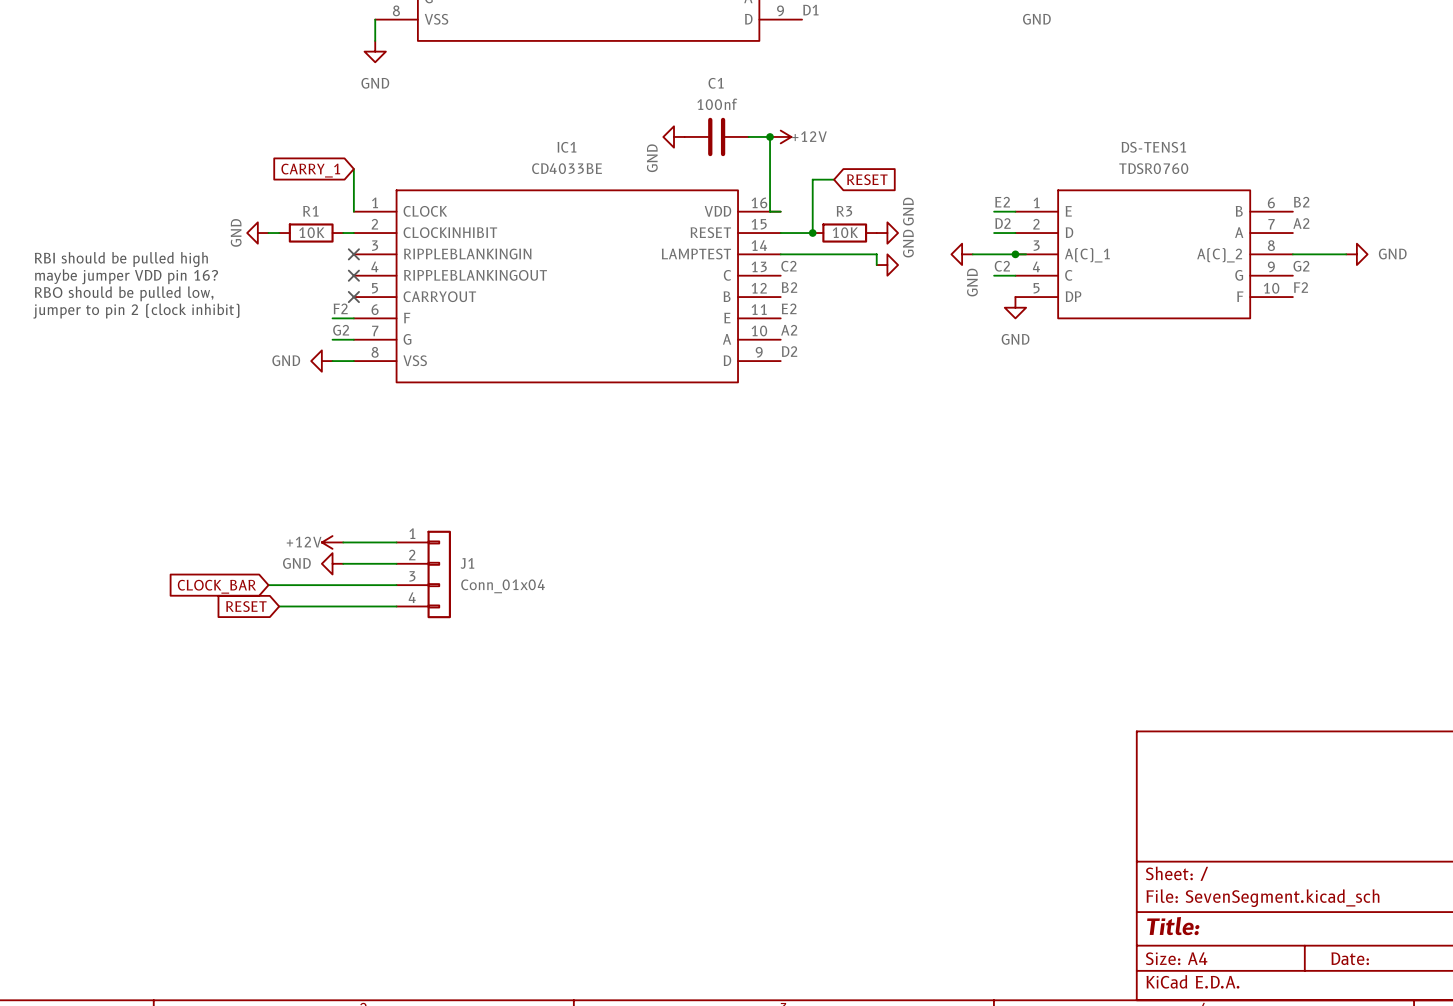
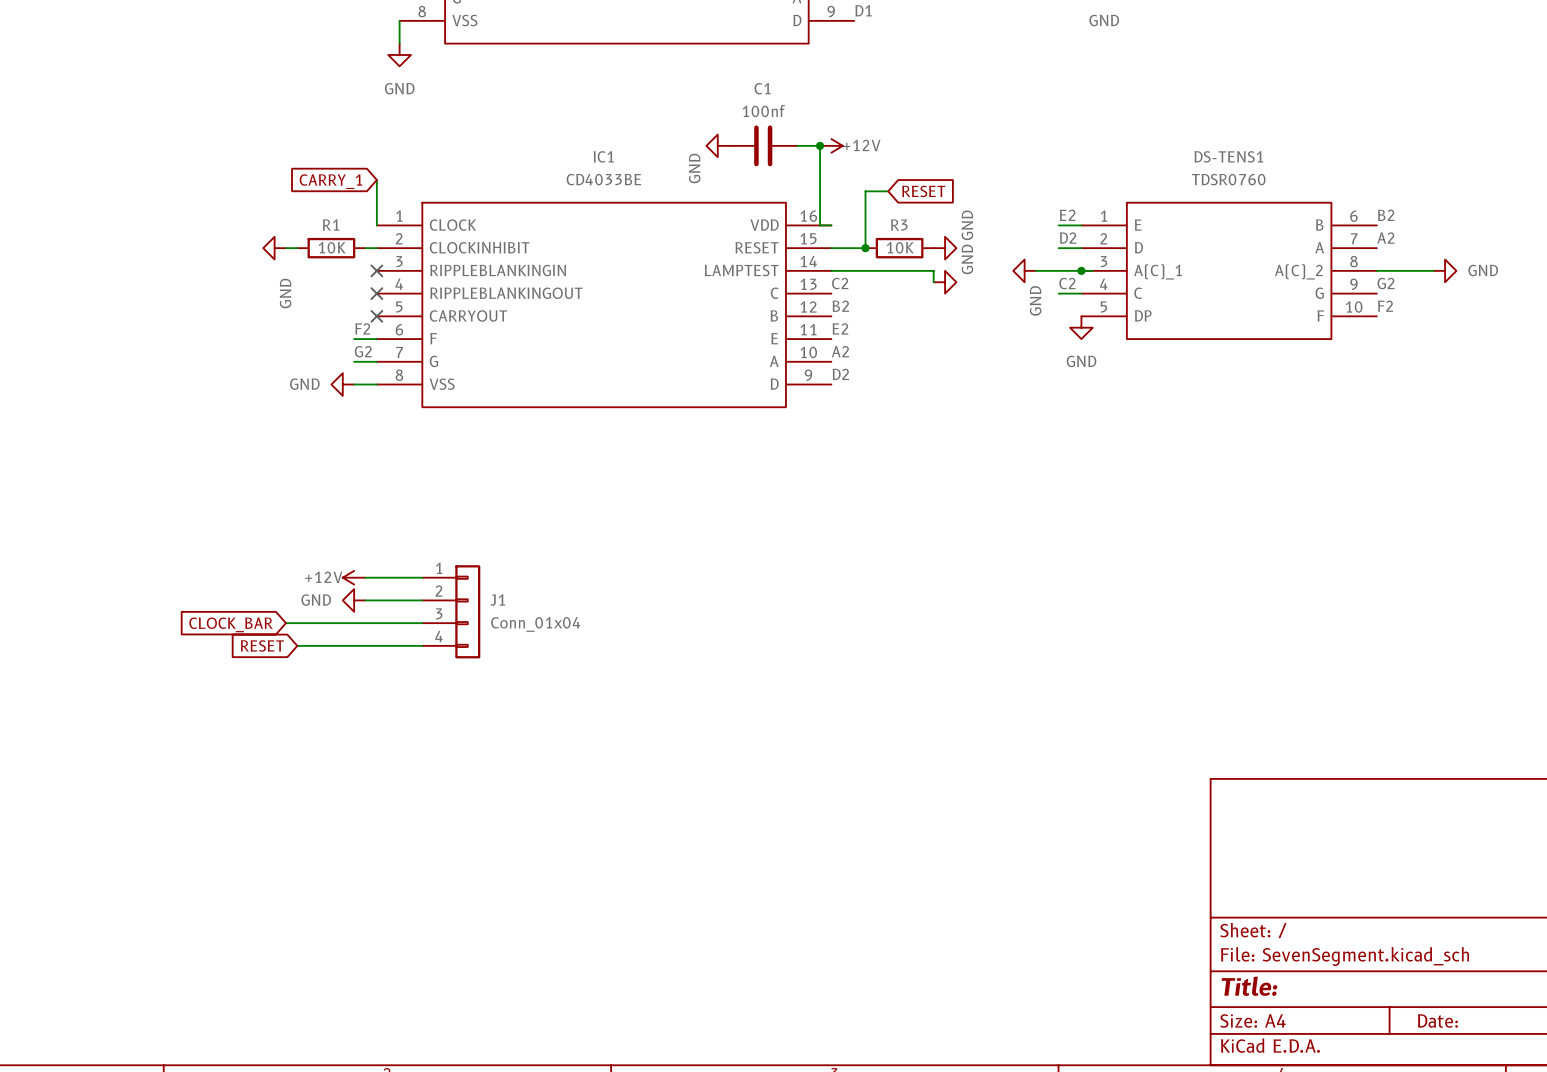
power symbol text position: GND (236, 232) -> GND (285, 293)
text: RBI should be pulled high (121, 259) -> none
text: maybe jumper VDD pin 16? (126, 276) -> none
text: RBO should be pulled low, (124, 293) -> none
text: jumper to pin 2 (clock inhibit) (136, 311) -> none

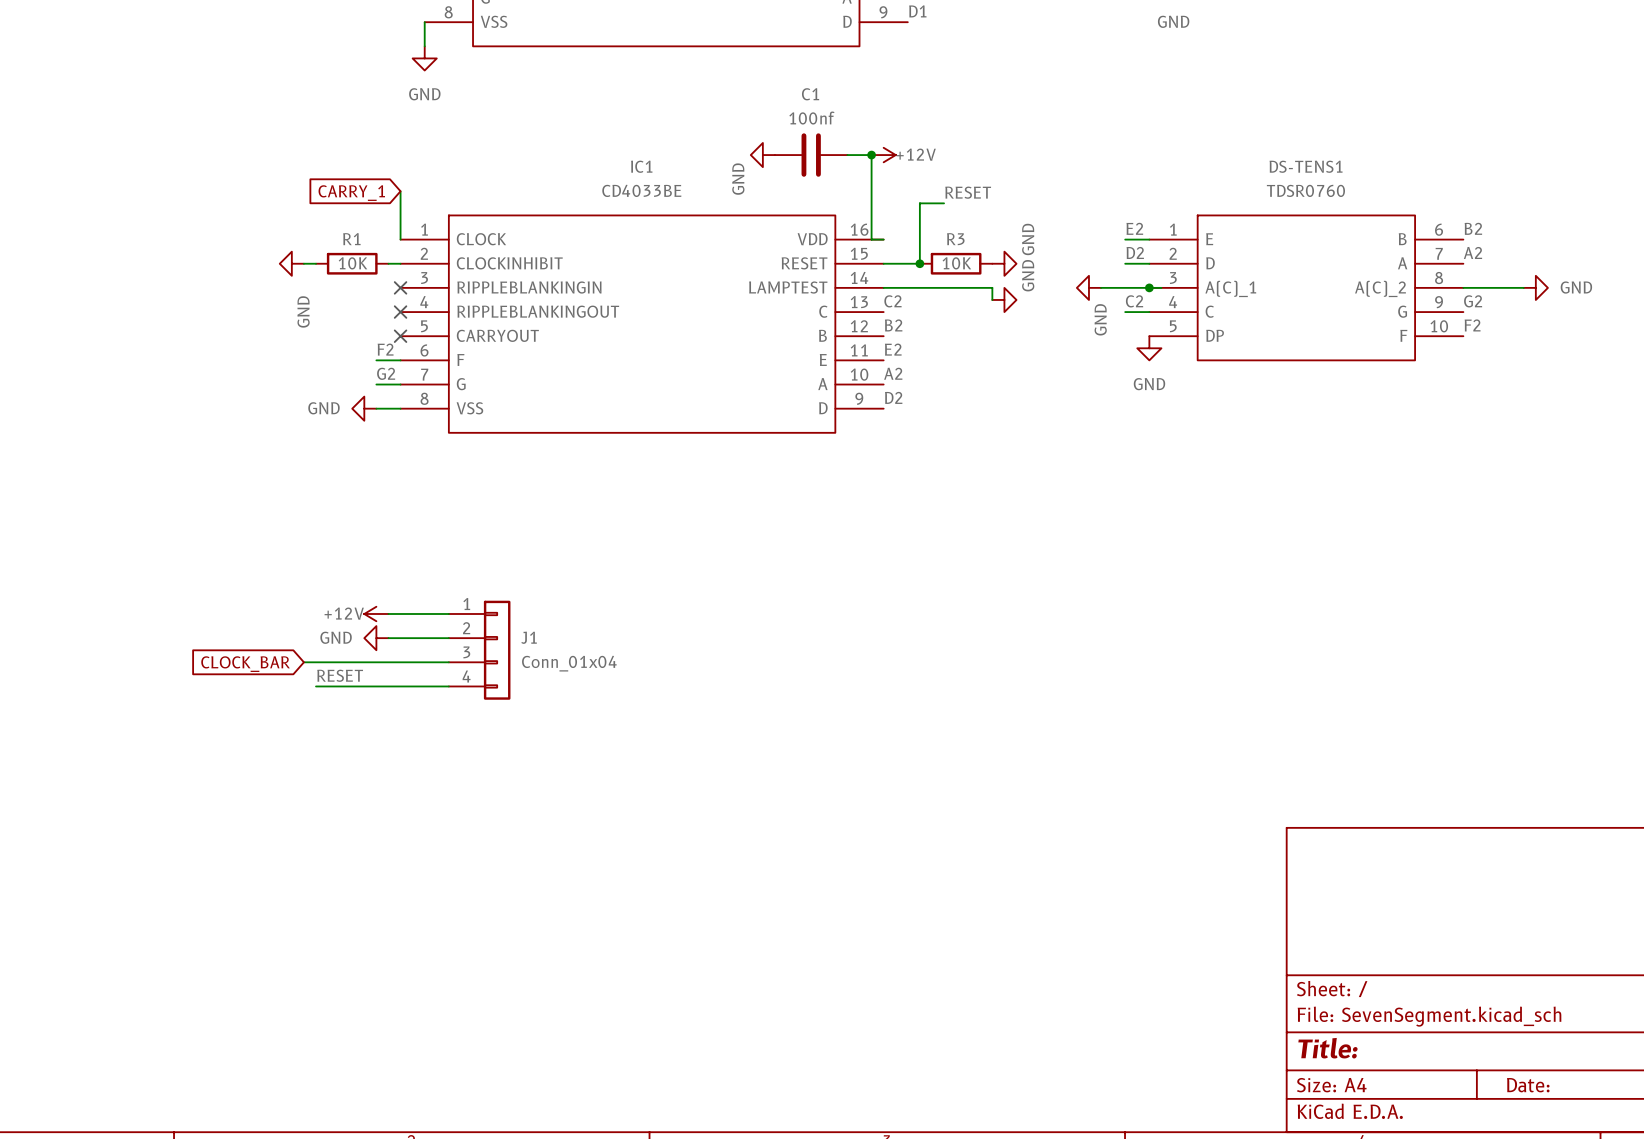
label: none -> RESET (968, 192)
global label: RESET (923, 191) -> none
label: none -> RESET (340, 675)
global label: RESET (262, 645) -> none

